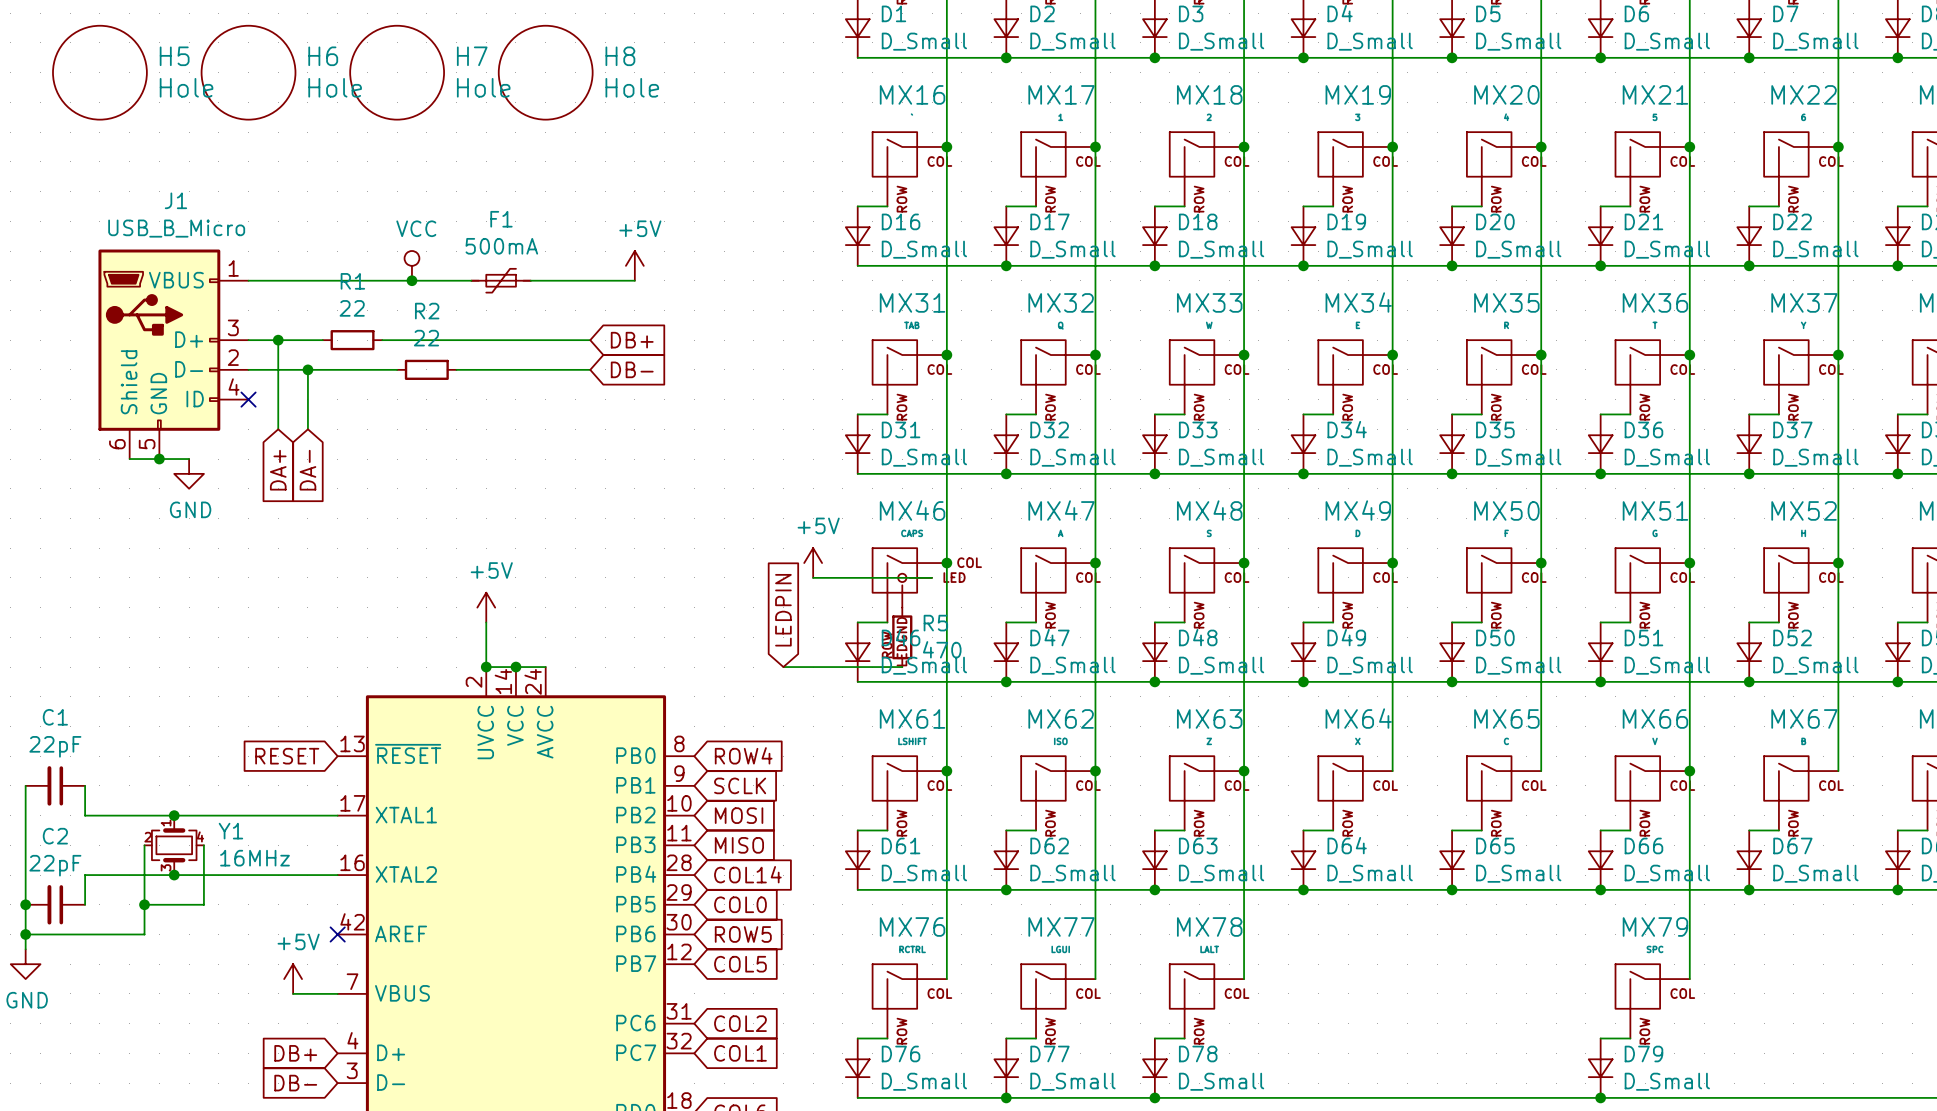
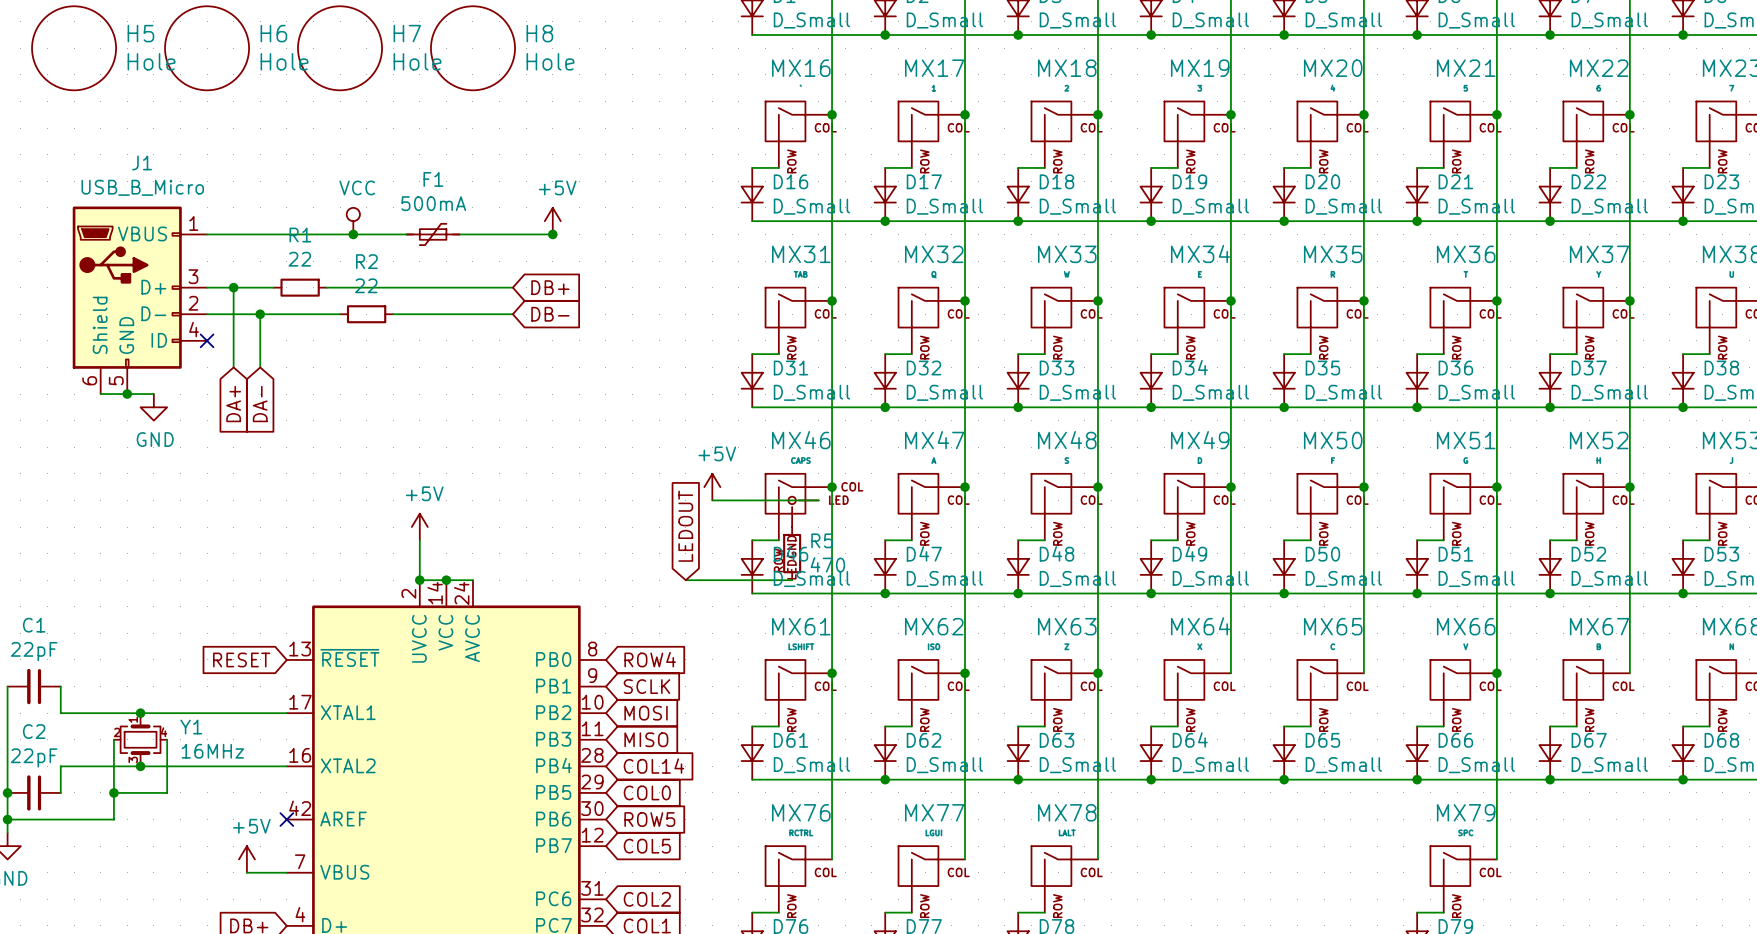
junction: none -> (552, 234)
global label: LEDPIN (783, 610) -> LEDOUT (685, 526)

